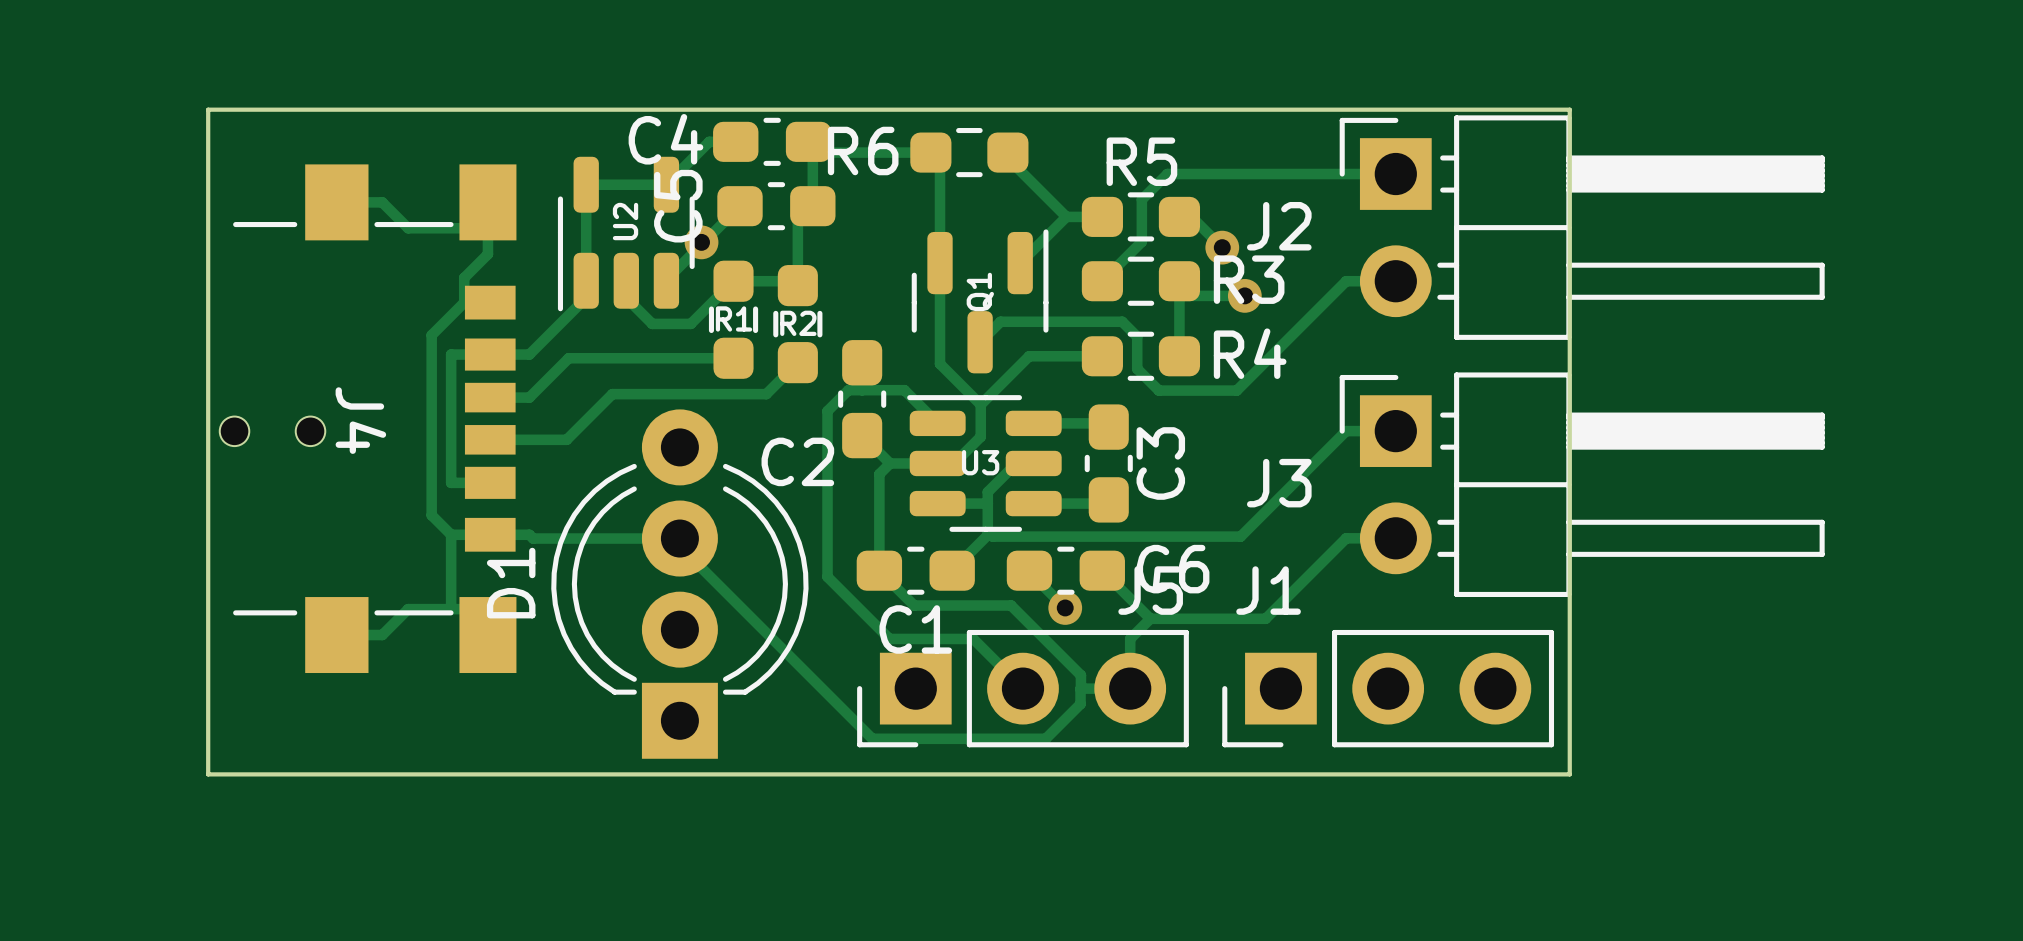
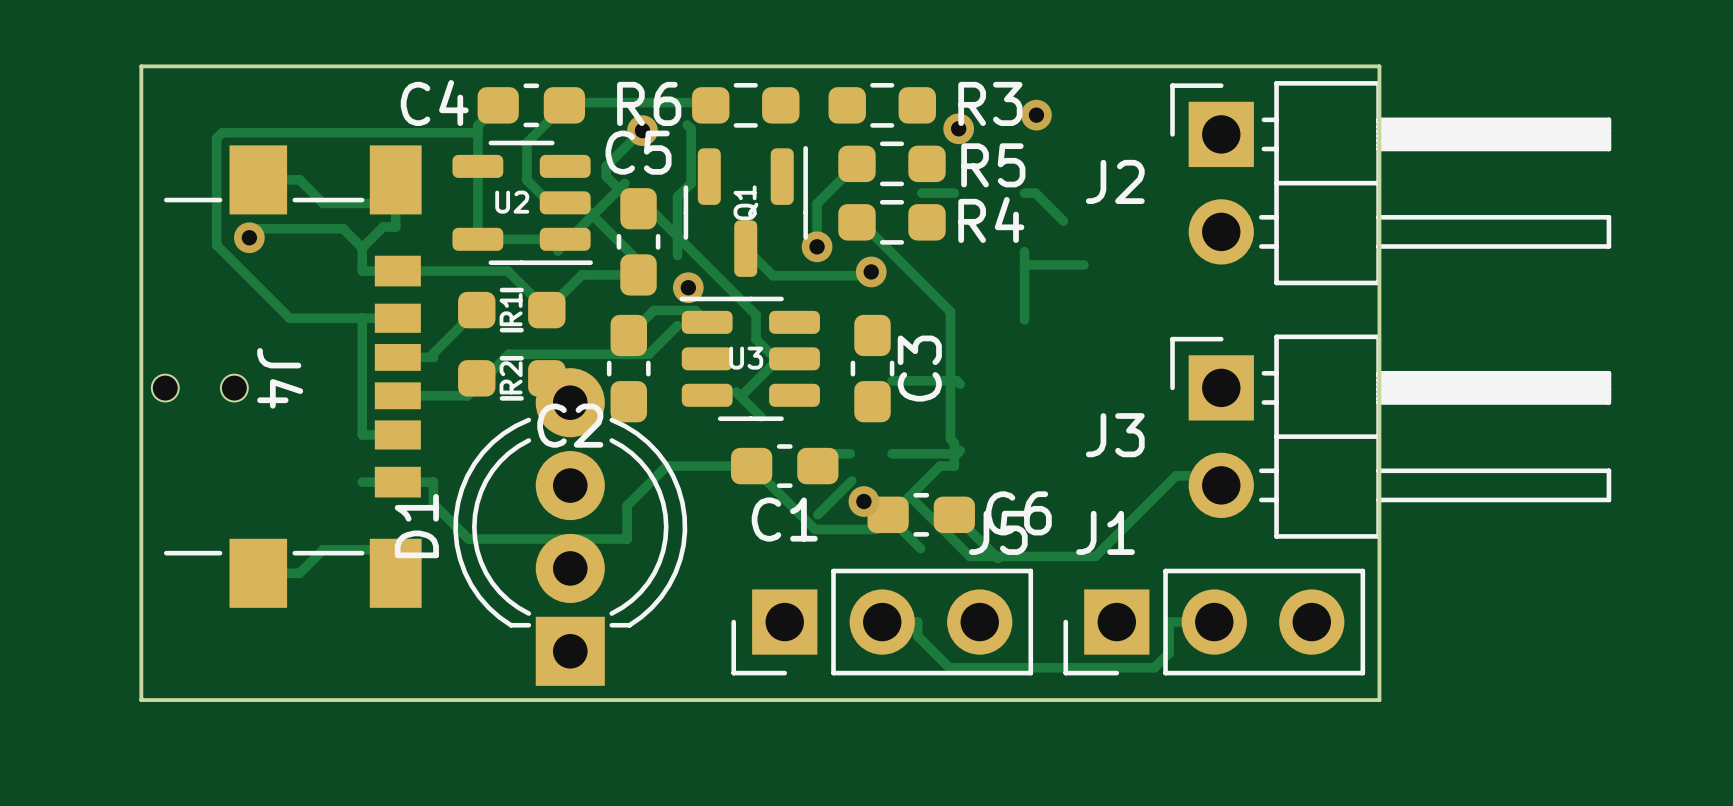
board edge: (208, 109) (1569, 109) -> (141, 95) (141, 66) (1379, 66) (1379, 95)
track: none -> (498, 105) (477, 125) (477, 239) (565, 239)
track: none -> (710, 105) (709, 106) (705, 102) (567, 102) (526, 142) (526, 180) (549, 202) (580, 202) (638, 261) (638, 274) (581, 274) (546, 310) (507, 271) (397, 271)
via: none -> (1036, 115)
track: (735, 141) (709, 141) (666, 184) (586, 184) (586, 297) (529, 354) (490, 354) -> none
C4 position: (772, 141) -> (531, 105)
via: none -> (958, 128)
track: none -> (642, 130) (606, 166) (606, 176) (638, 208) (649, 208) (756, 315) (756, 339) (775, 358) (794, 358)
via: none -> (642, 130)
track: none -> (477, 132) (222, 132) (216, 138) (216, 245) (289, 318) (362, 318)
track: (812, 152) (930, 152) (940, 161) (940, 363) (980, 404) -> none
R6 position: (969, 152) -> (745, 105)
track: (1007, 152) (1007, 158) (1066, 216) (1020, 263) -> none
R5 name position: R5 (1141, 161) -> R5 (993, 165)
track: (1395, 174) (1167, 174) (1141, 199) (1141, 241) (1102, 281) -> none
track: none -> (856, 163) (817, 203) (817, 246)
C5 rotation: 0° (776, 206) -> 90° clockwise (638, 241)
R5 position: (1140, 216) -> (882, 105)
J2 position: (1582, 227) -> (1390, 183)
U2 rotation: 0° (626, 234) -> 90° counterclockwise (522, 202)
via: (701, 242) -> none
via: (1222, 247) -> none
track: (487, 254) (464, 277) (464, 302) (431, 335) (431, 515) (451, 534) (451, 609) -> (395, 226) (383, 226) (362, 247)
track: none -> (249, 237) (258, 228) (343, 228) (362, 247)
via: none -> (249, 237)
via: none -> (817, 246)
track: none -> (362, 247) (362, 271) (374, 271)
track: none -> (745, 248) (772, 275) (867, 275) (871, 271)
R3 name position: R3 (1249, 279) -> R3 (990, 103)
track: (626, 280) (626, 297) (652, 323) (690, 323) (733, 281) (797, 281) -> none
R3 position: (1140, 281) -> (892, 163)
track: (1395, 281) (1346, 281) (1236, 390) (1158, 390) (1137, 368) (1137, 336) (1122, 321) (1000, 321) (980, 342) -> none
via: (1244, 295) -> none
Q1 position: (980, 301) -> (745, 211)
via: none -> (871, 271)
R1 rotation: 0° (733, 319) -> 90° clockwise (511, 310)
R1 position: (733, 319) -> (511, 310)
via: none -> (688, 287)
R2 rotation: 0° (797, 324) -> 90° clockwise (511, 378)
R2 position: (797, 324) -> (511, 378)
track: (1102, 356) (1029, 356) (980, 404) -> none
R4 position: (1140, 356) -> (892, 222)
track: (733, 358) (568, 358) (529, 397) -> (476, 310) (433, 353) (433, 357)
track: none -> (707, 322) (695, 310) (653, 310) (628, 335)
C2 position: (862, 399) -> (628, 368)
track: none -> (778, 358) (742, 395)
track: (980, 404) (980, 436) (954, 463) (890, 463) (879, 474) (879, 570) (914, 605) (1011, 605) (1080, 675) (1080, 688) (1130, 688) (1130, 638) (1150, 618) (1265, 618) (1346, 538) (1395, 538) -> none
track: (937, 423) (904, 390) (848, 390) (827, 411) (827, 576) (889, 638) (973, 638) (1022, 688) -> none
track: (1395, 431) (1346, 431) (1240, 536) (992, 536) (987, 531) (987, 492) (1016, 463) (1033, 463) -> none
U3 position: (984, 463) -> (749, 358)
C3 position: (1108, 463) -> (872, 368)
track: none -> (1221, 475) (1176, 475) (1095, 556) (969, 556) (909, 496)
track: (529, 534) (533, 538) (679, 538) (679, 546) (872, 738) (1045, 738) (1080, 704) (1080, 689) -> (433, 482) (433, 503) (468, 538) (627, 538) (627, 505) (666, 466) (751, 466) (815, 529) (876, 529) (940, 466) (954, 466) (954, 442) (950, 439) (950, 311) (861, 222) (856, 222)
C1 position: (915, 570) -> (784, 466)
via position: (1065, 607) -> (863, 501)
track: none -> (872, 622) (917, 622) (917, 636) (949, 667) (1154, 667) (1169, 653) (1169, 622) (1214, 622)

